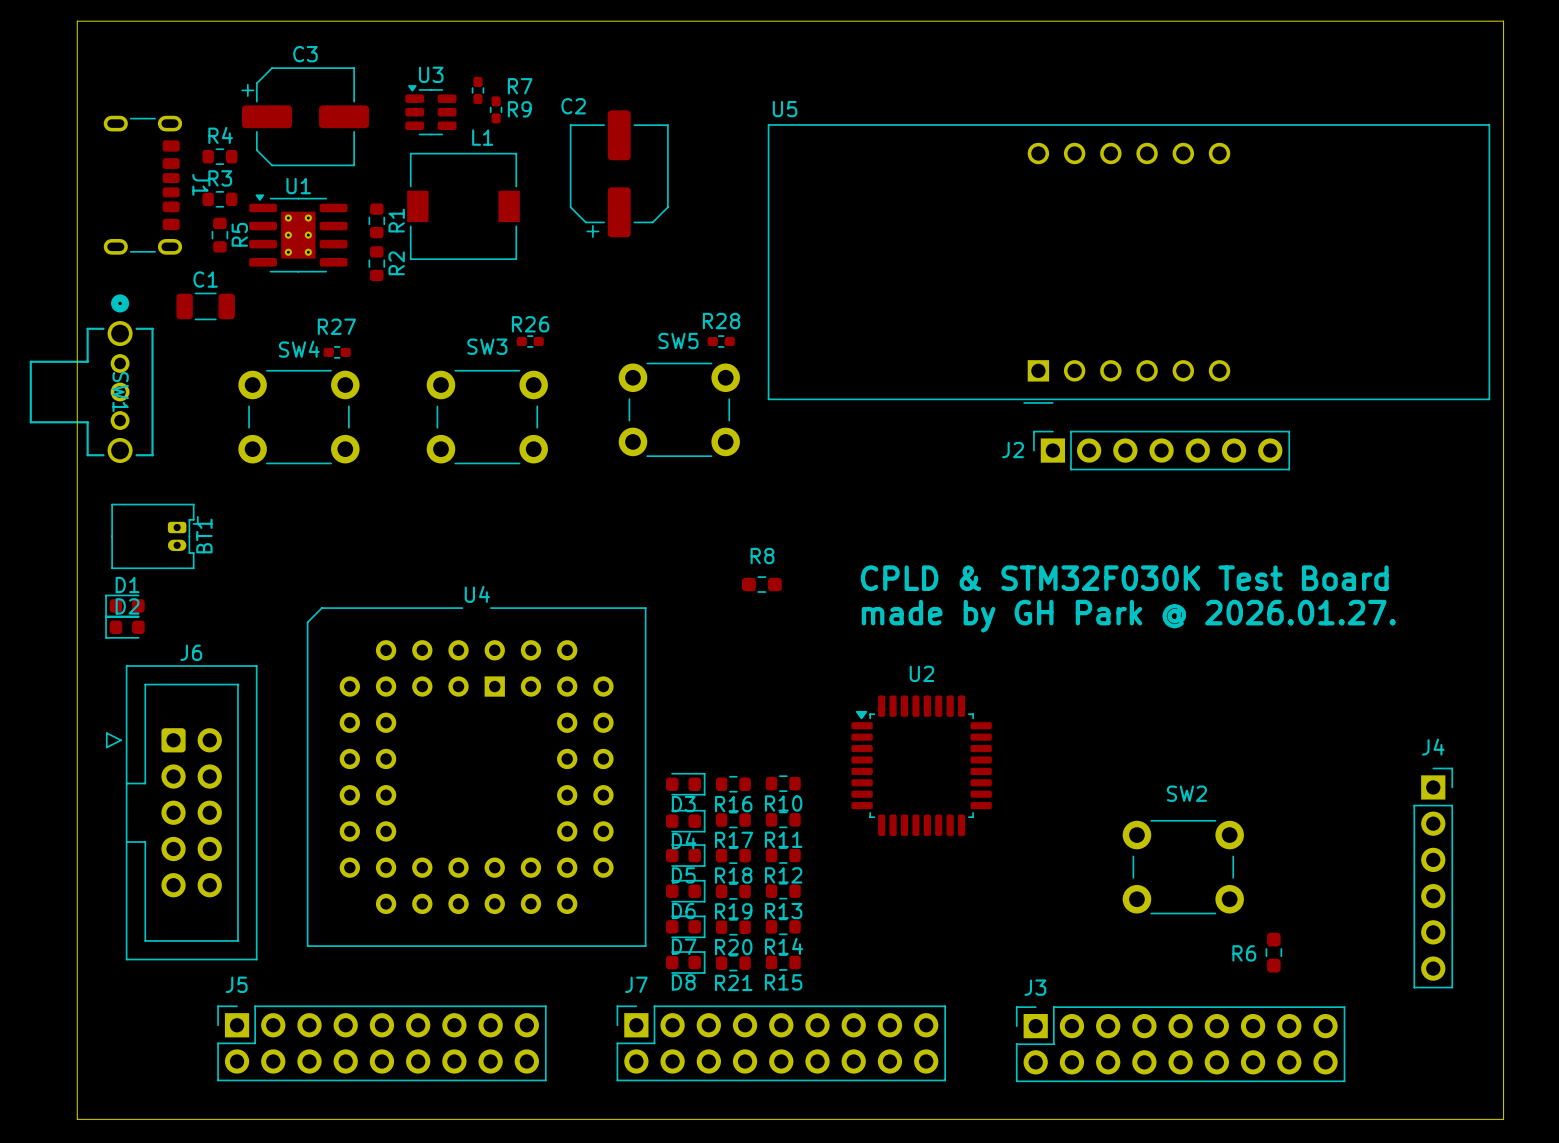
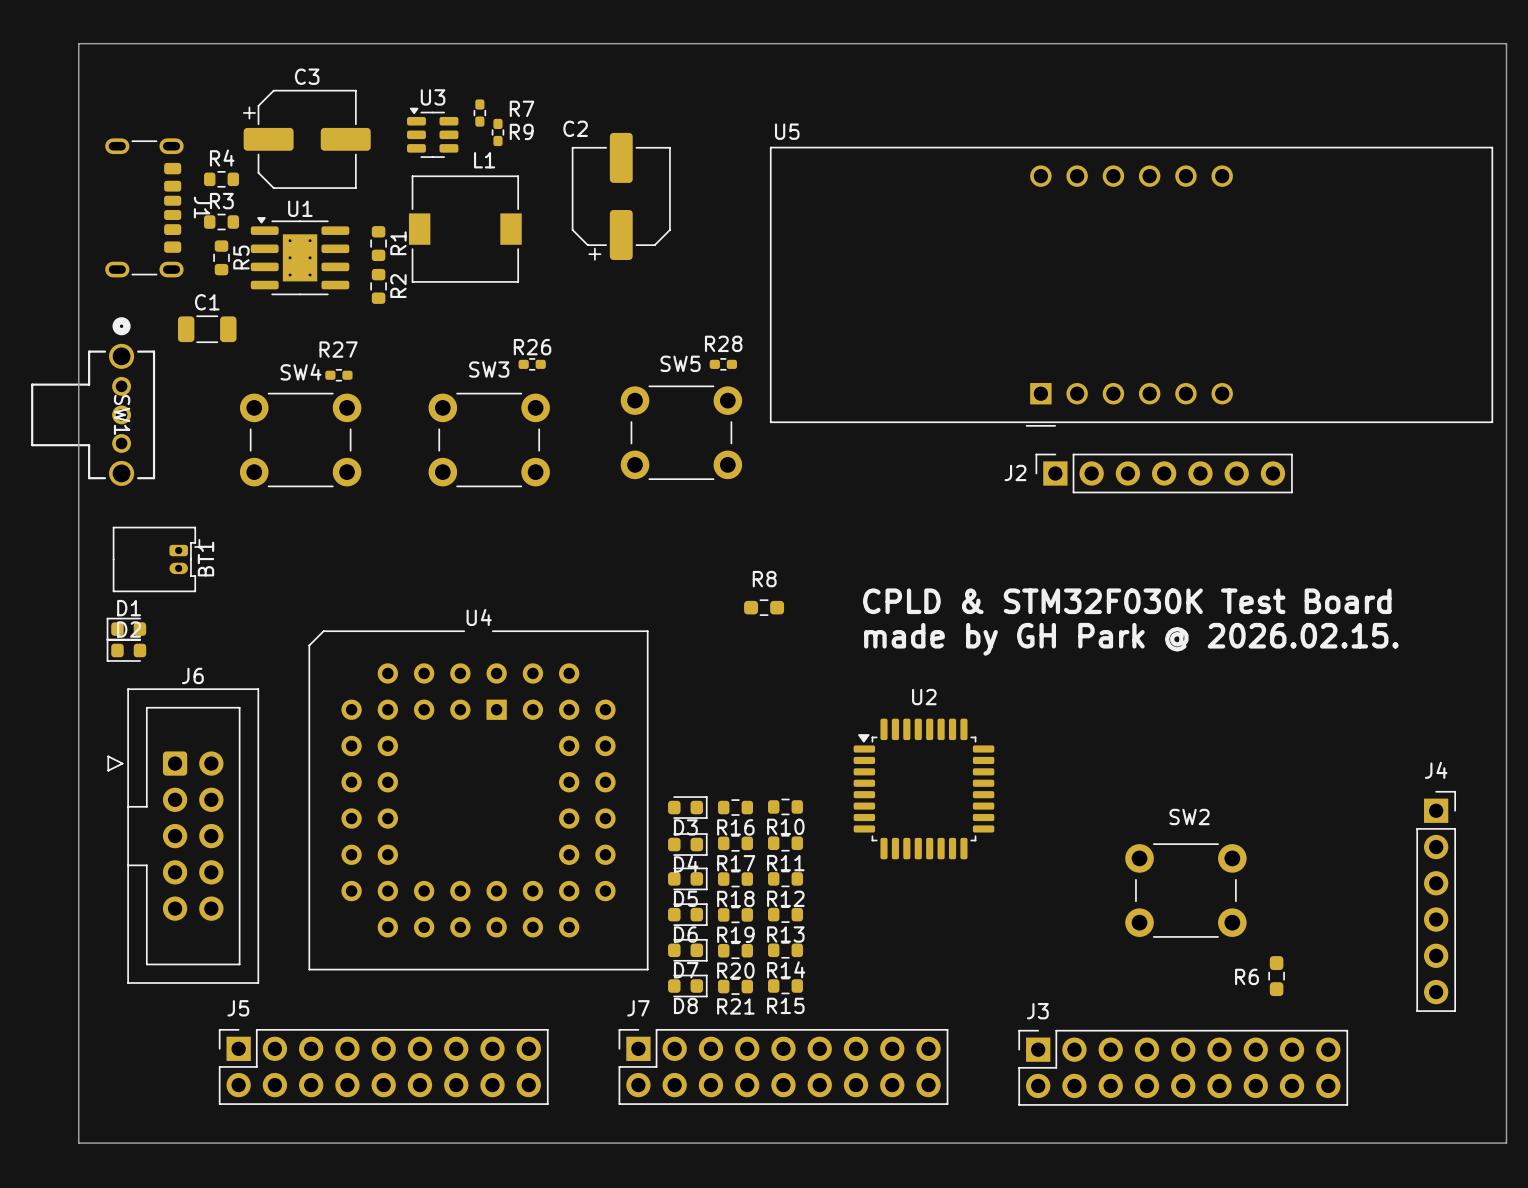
text: made by GH Park @ 2026.01.27. (1128, 616) -> made by GH Park @ 2026.02.15. (1131, 639)

